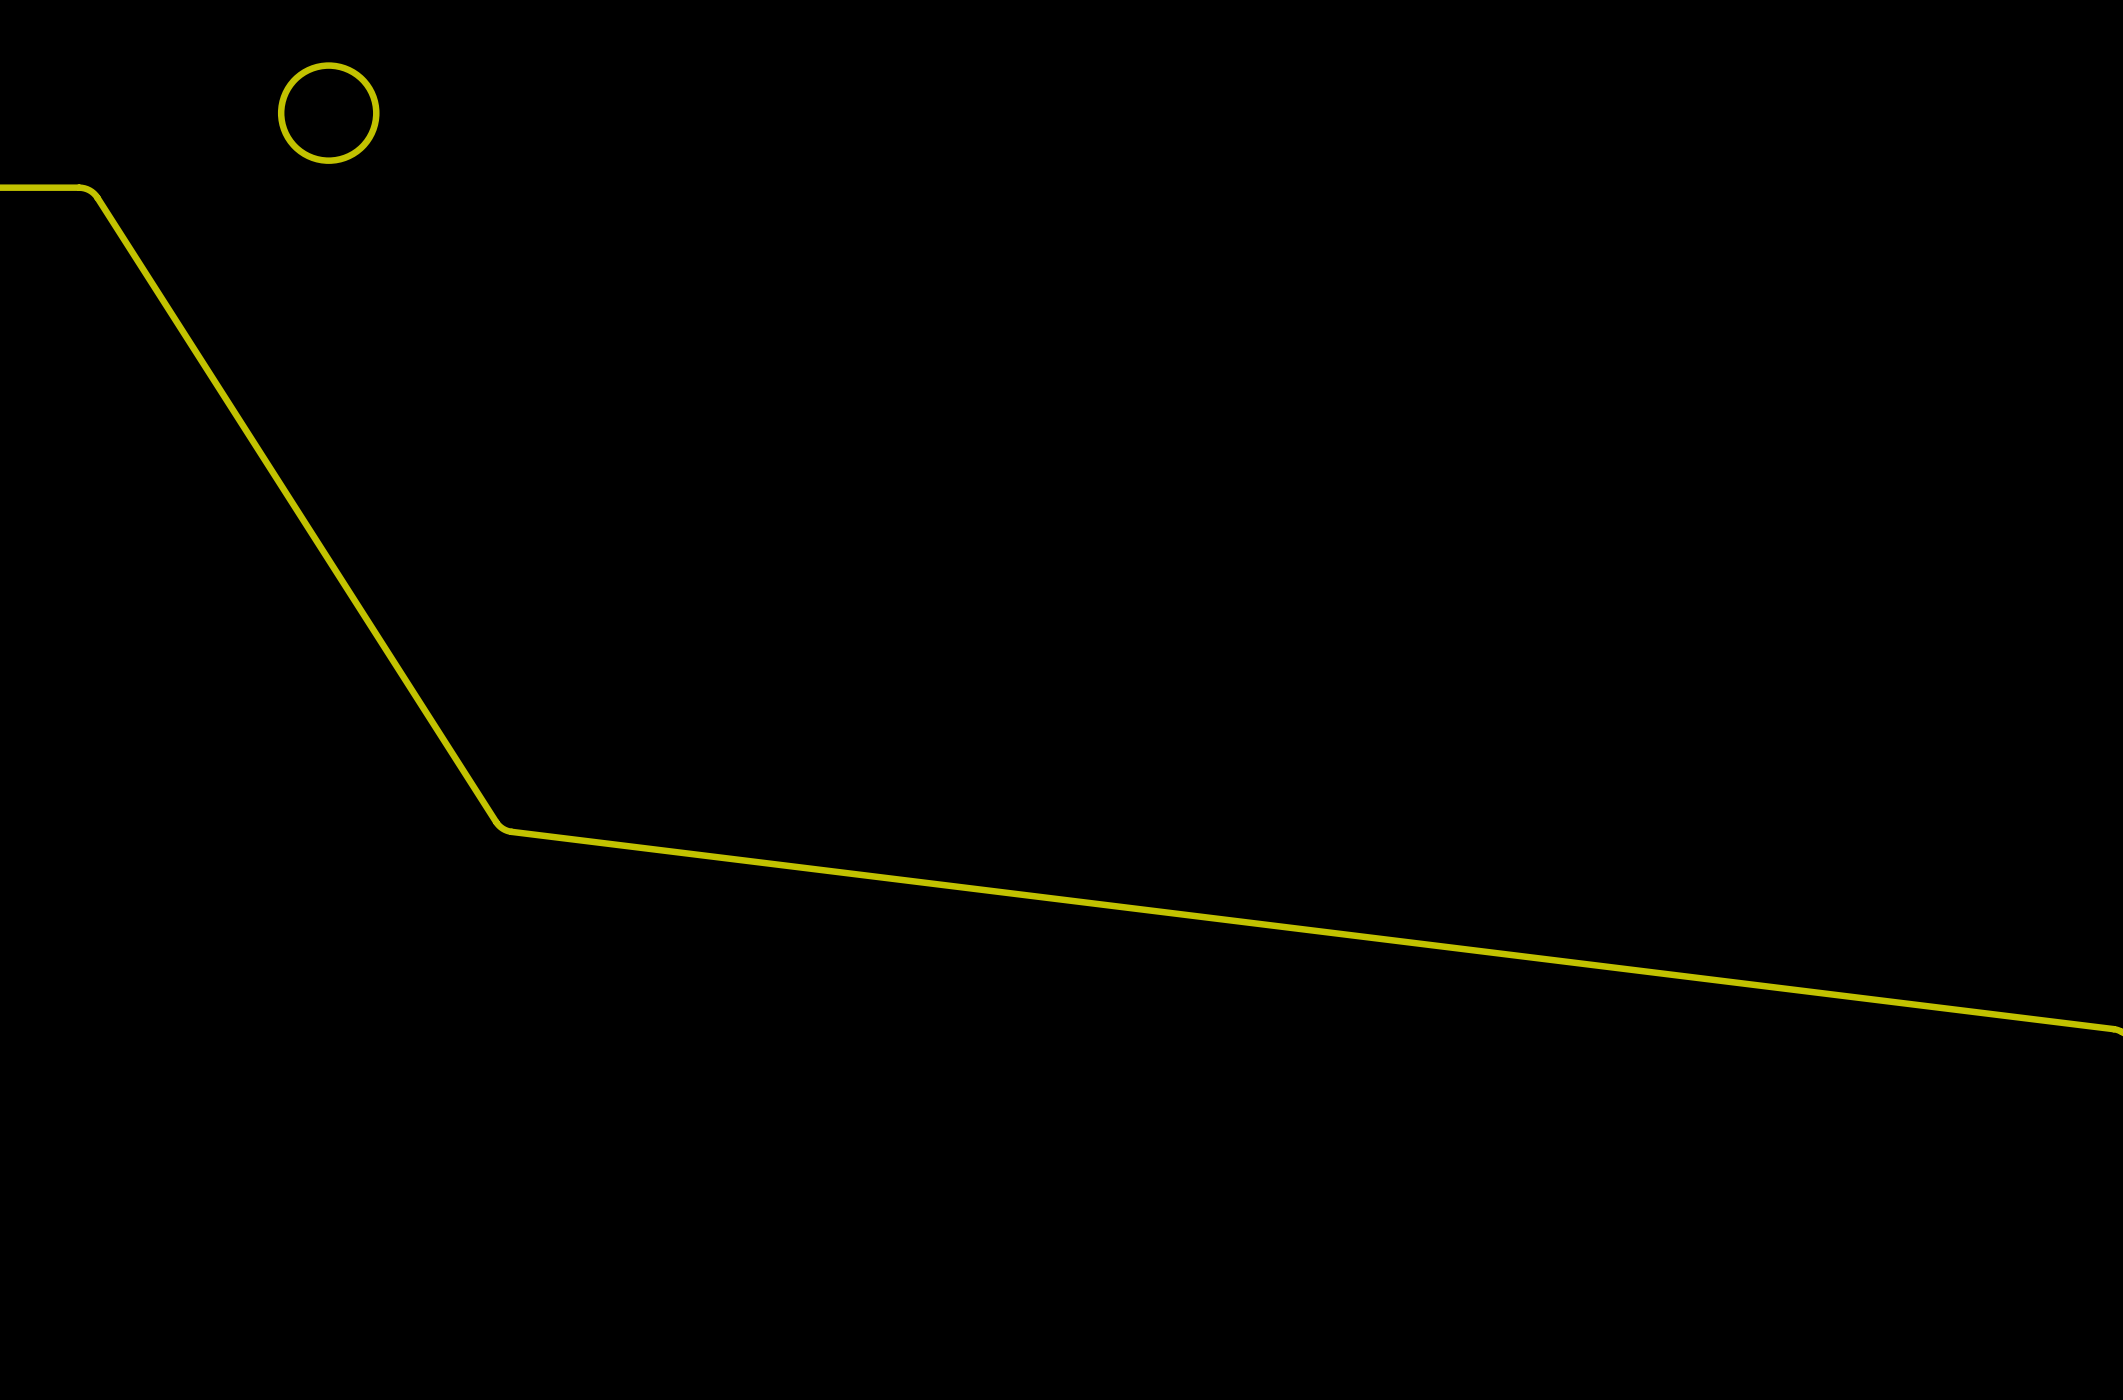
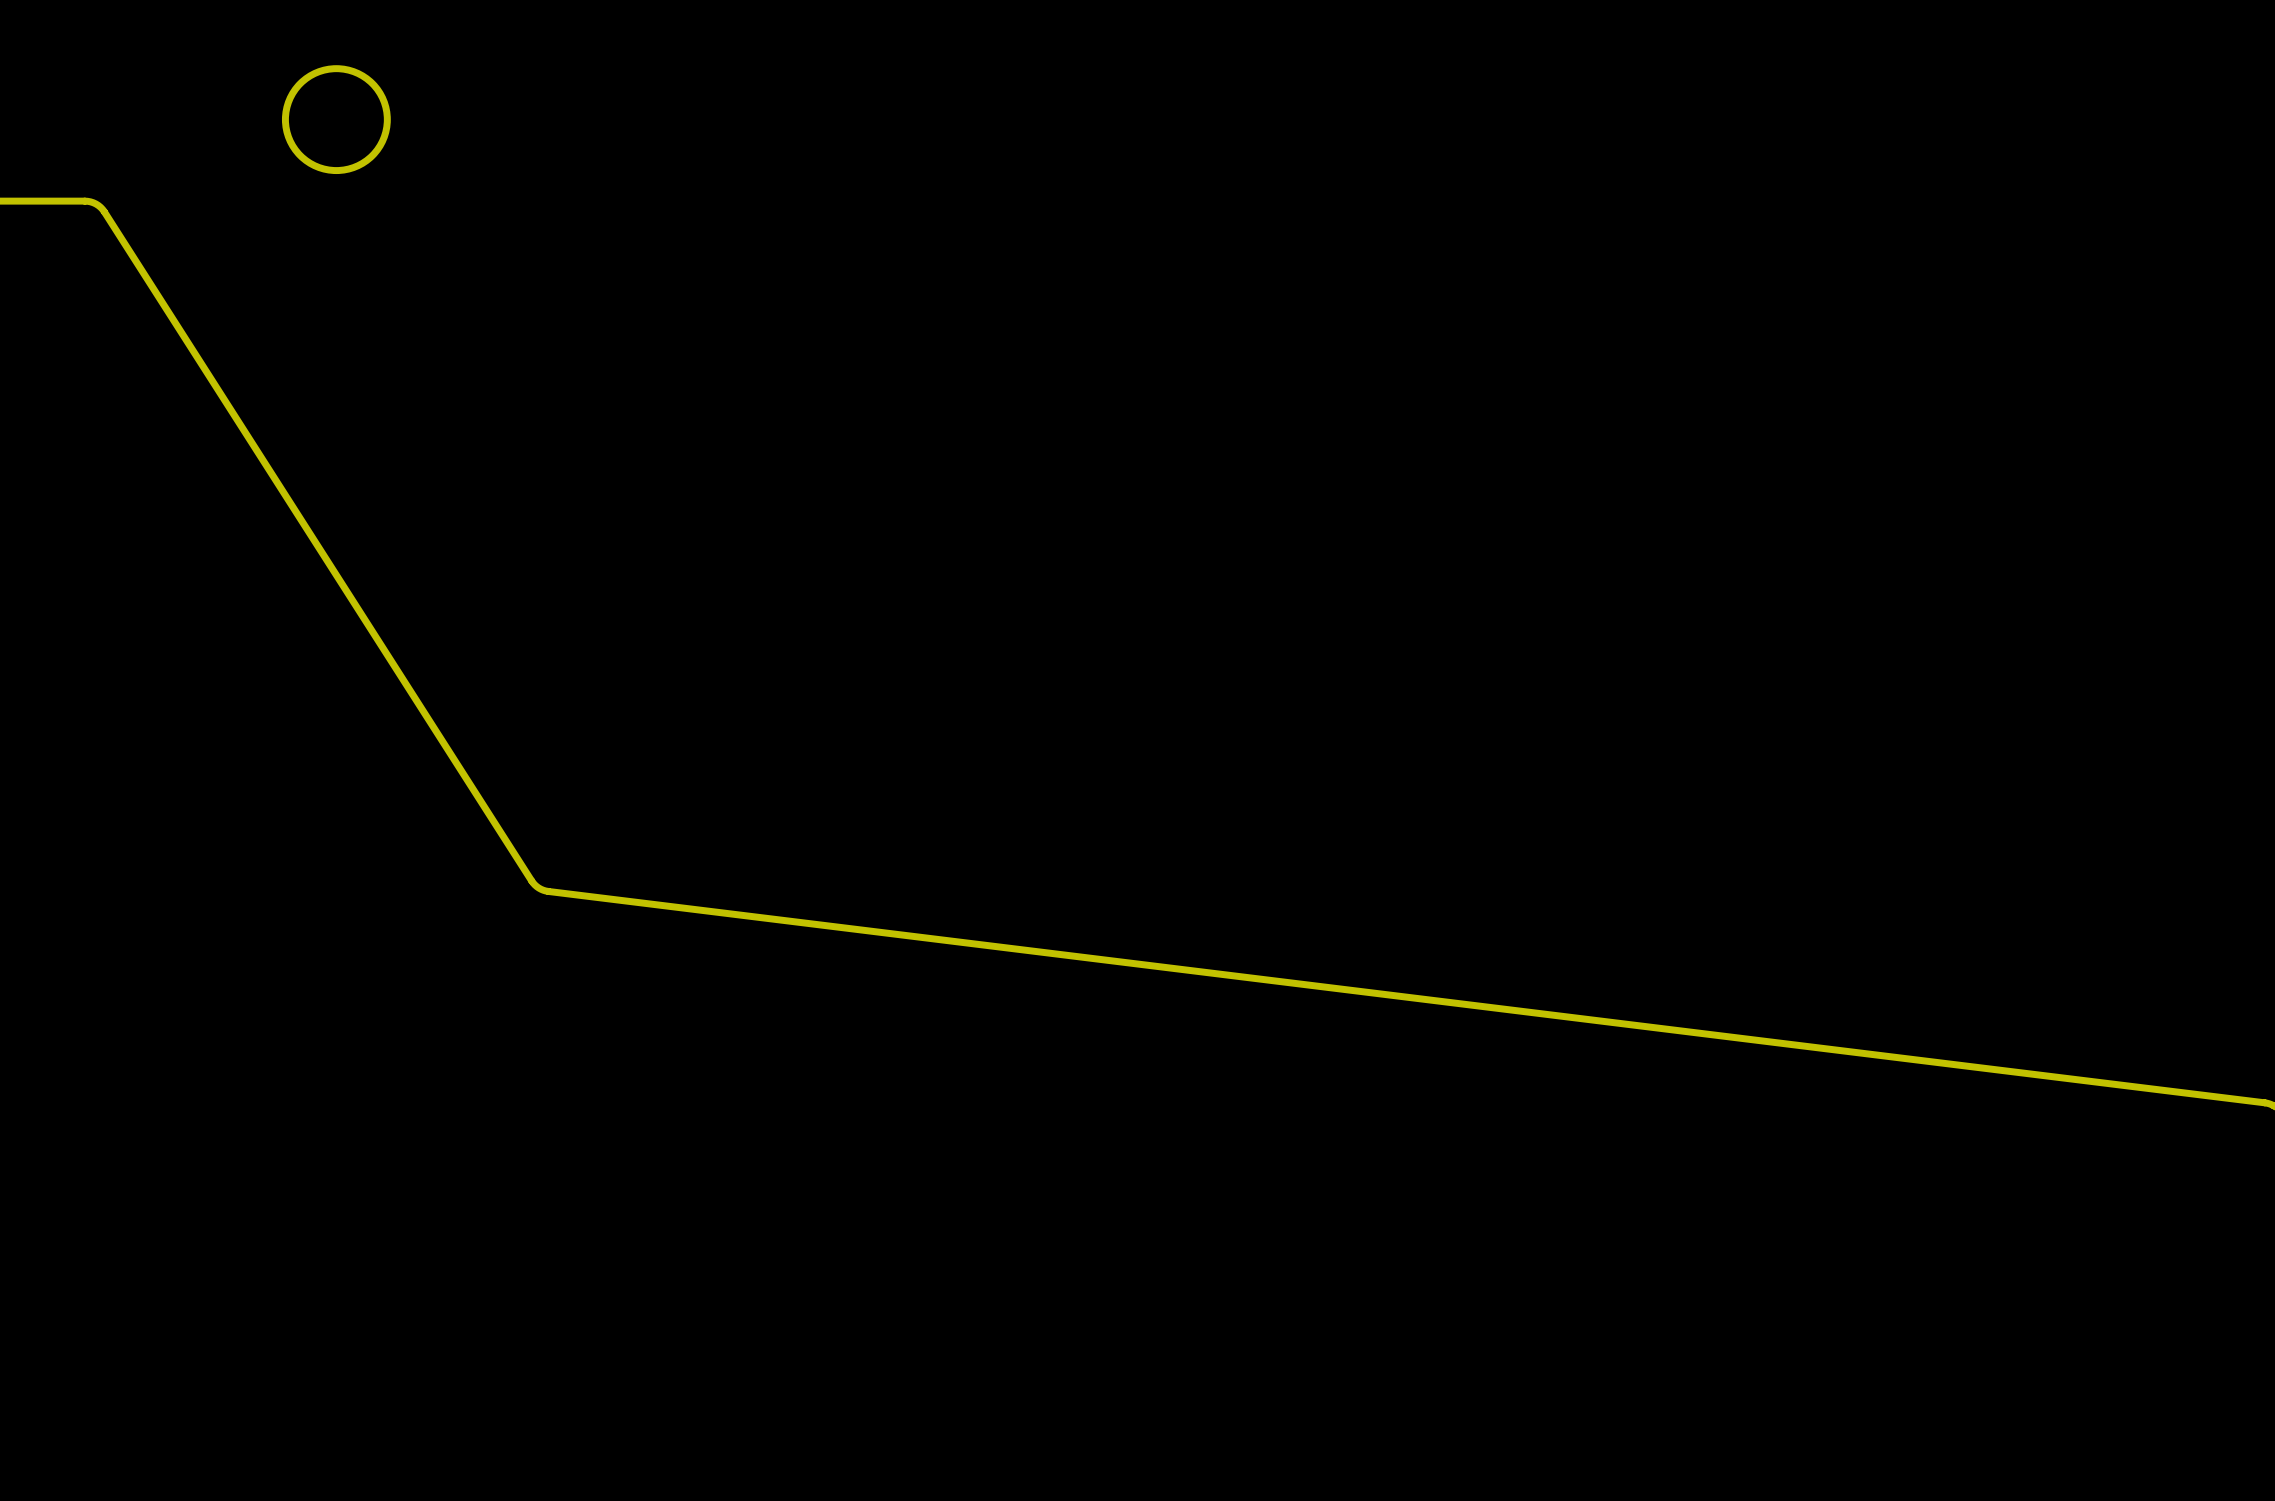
round board edge position: (328, 113) -> (336, 119)

